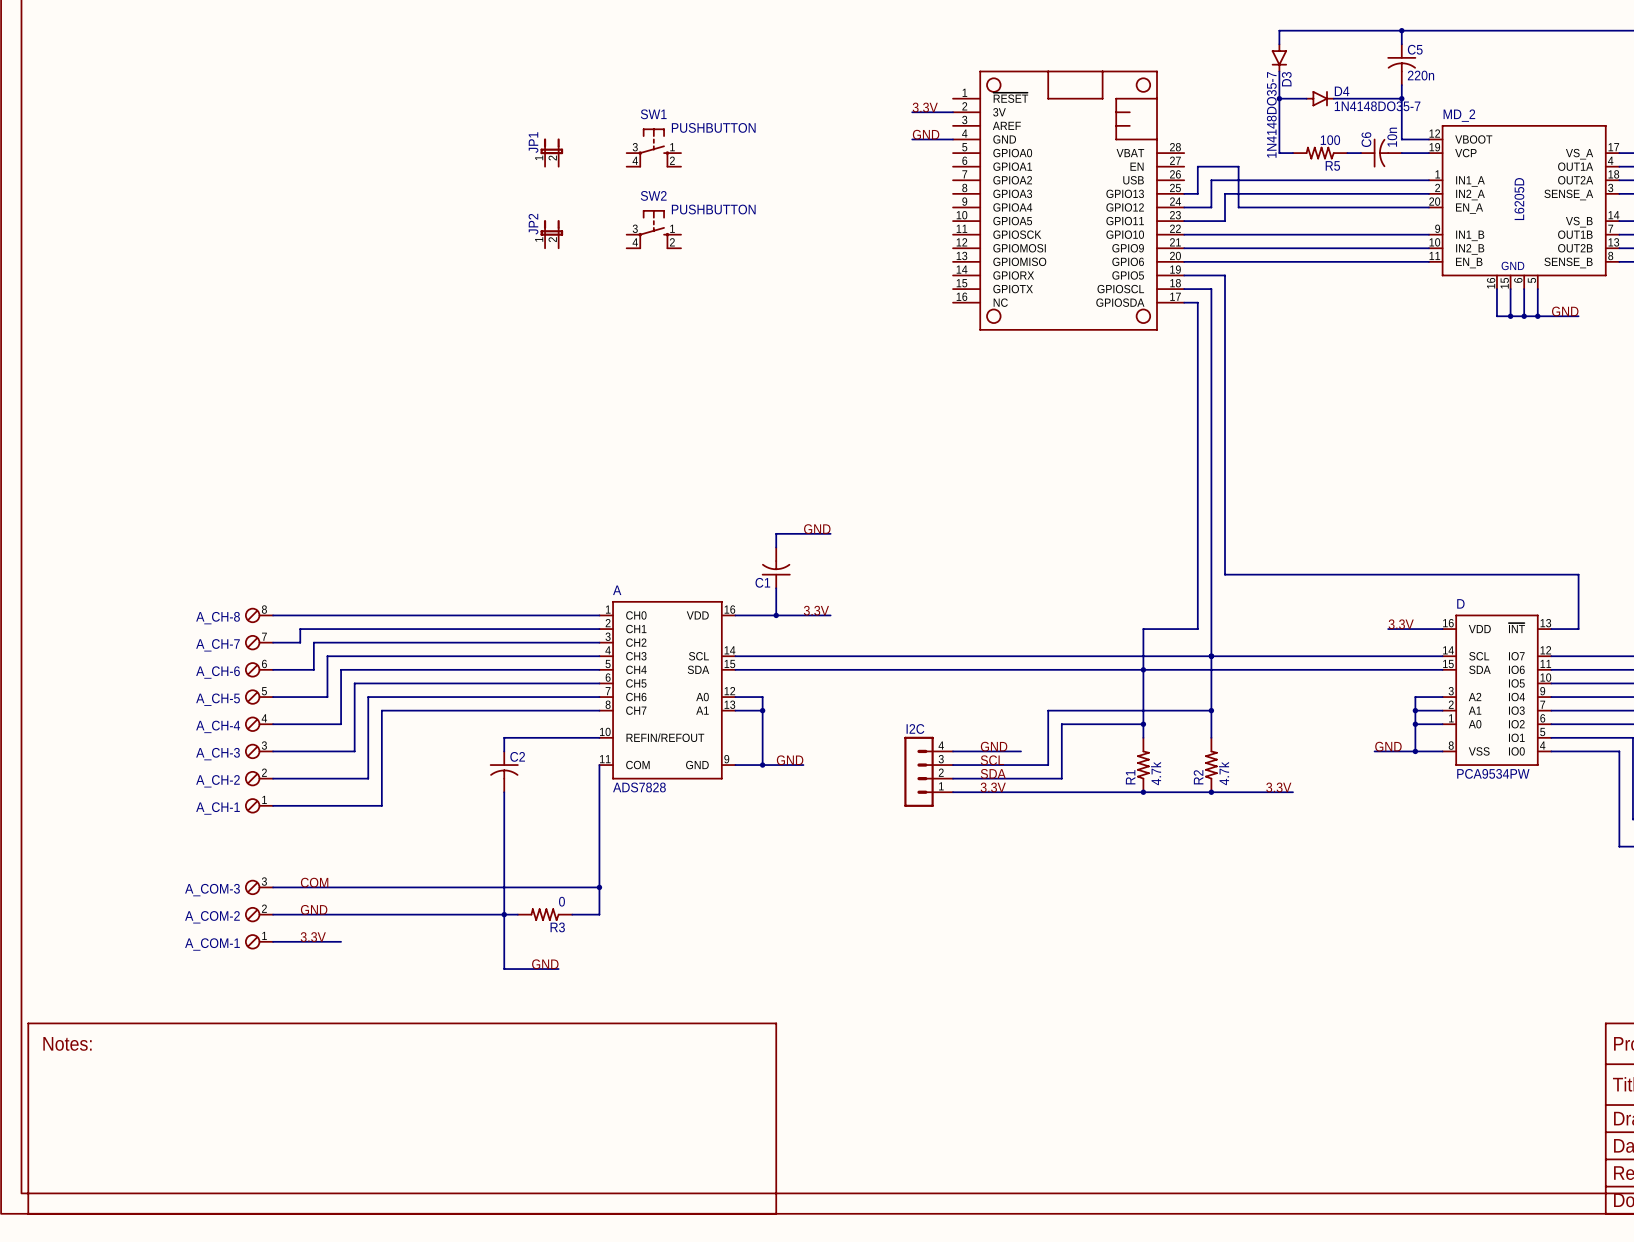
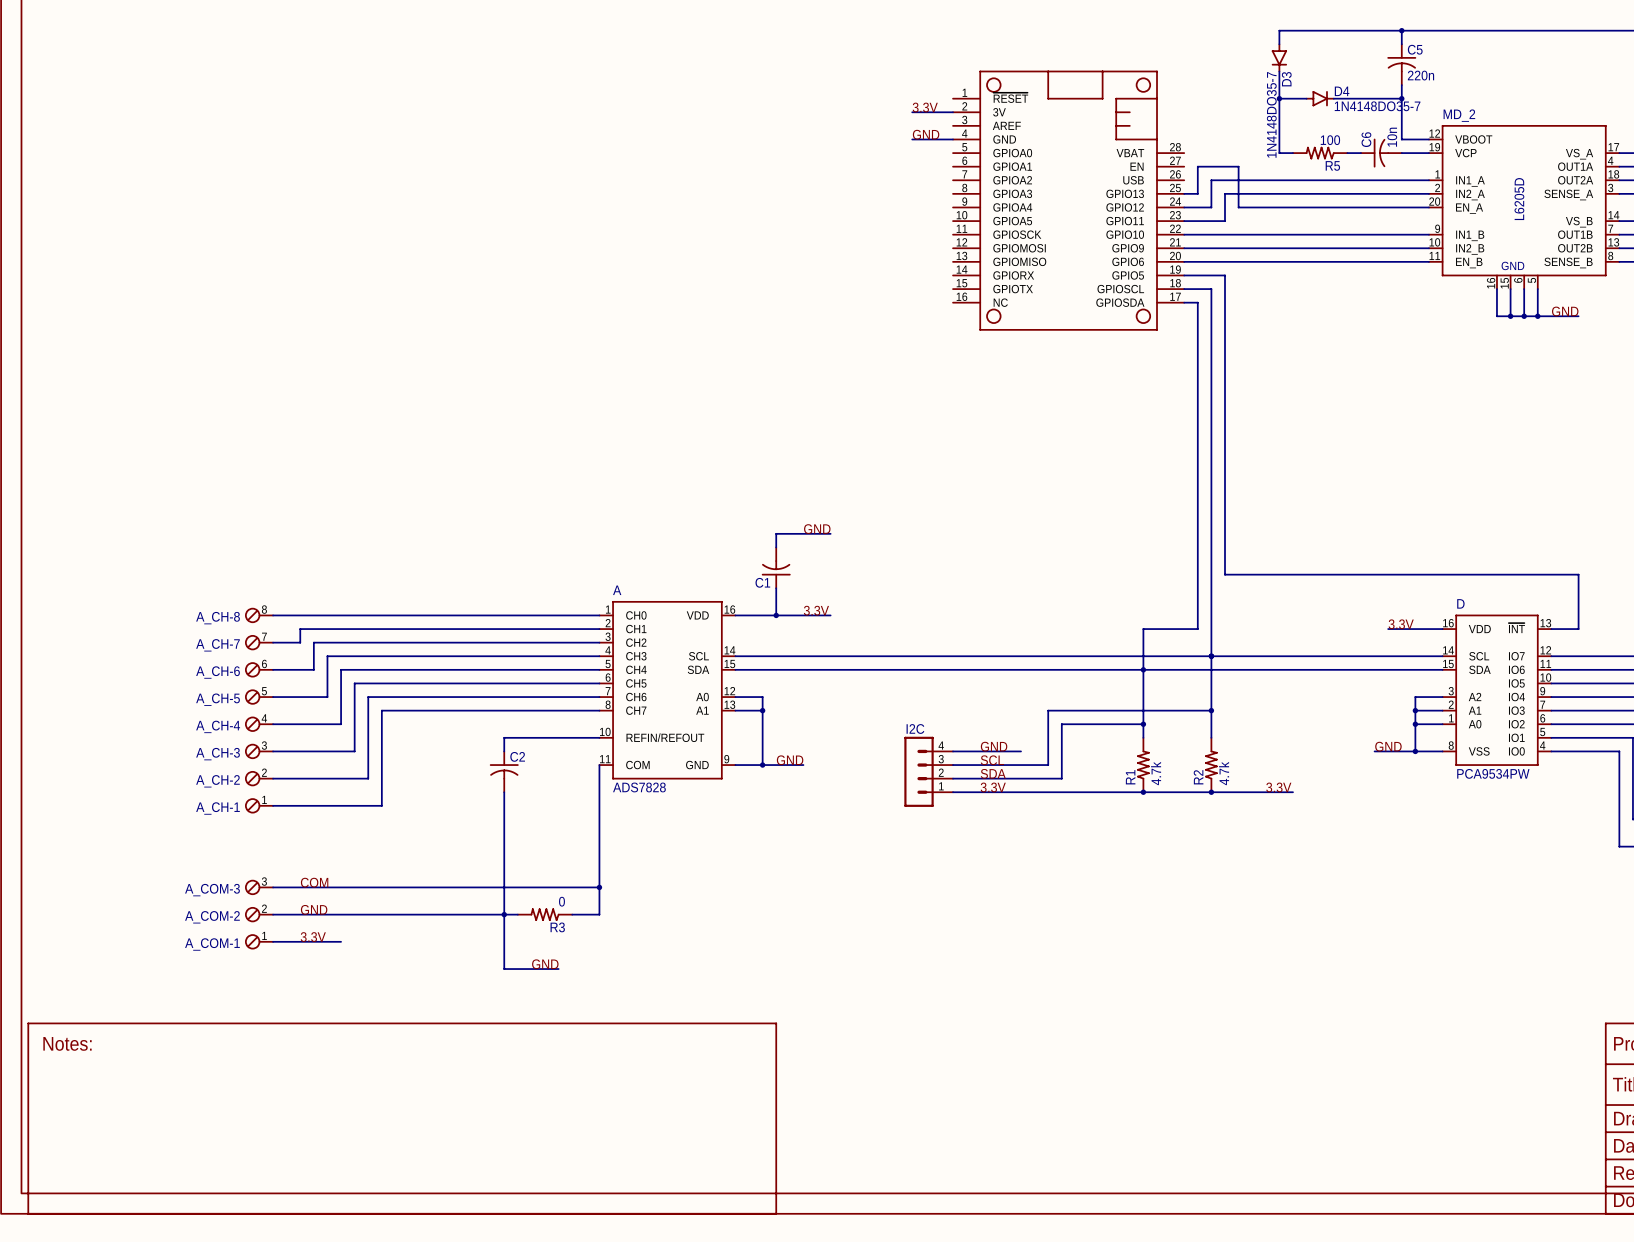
SW1: PUSHBUTTON (653, 147) -> none
JP1: (551, 152) -> none
SW2: PUSHBUTTON (653, 229) -> none
JP2: (551, 234) -> none

